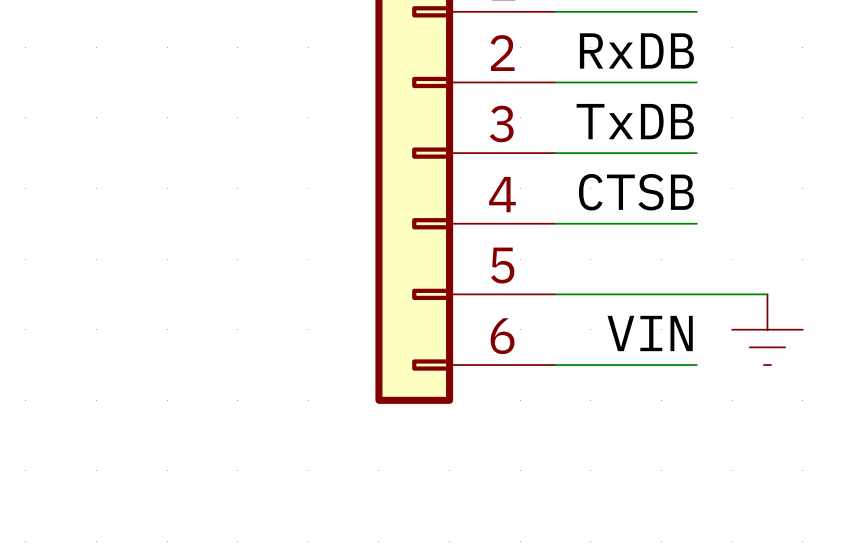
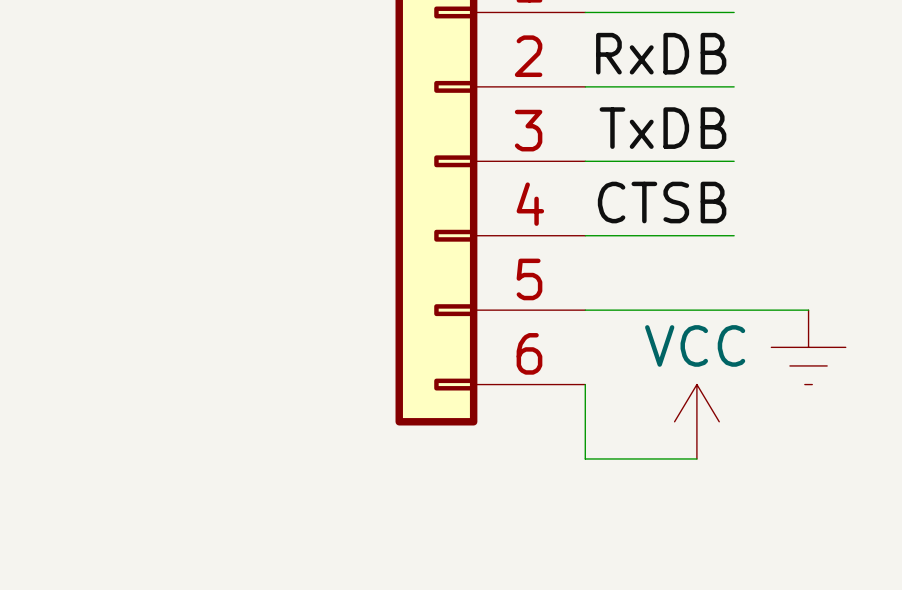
label: VIN (650, 333) -> none
wire: (555, 365) (696, 365) -> (585, 384) (585, 458) (696, 458)
power symbol: none -> VCC (696, 421)

